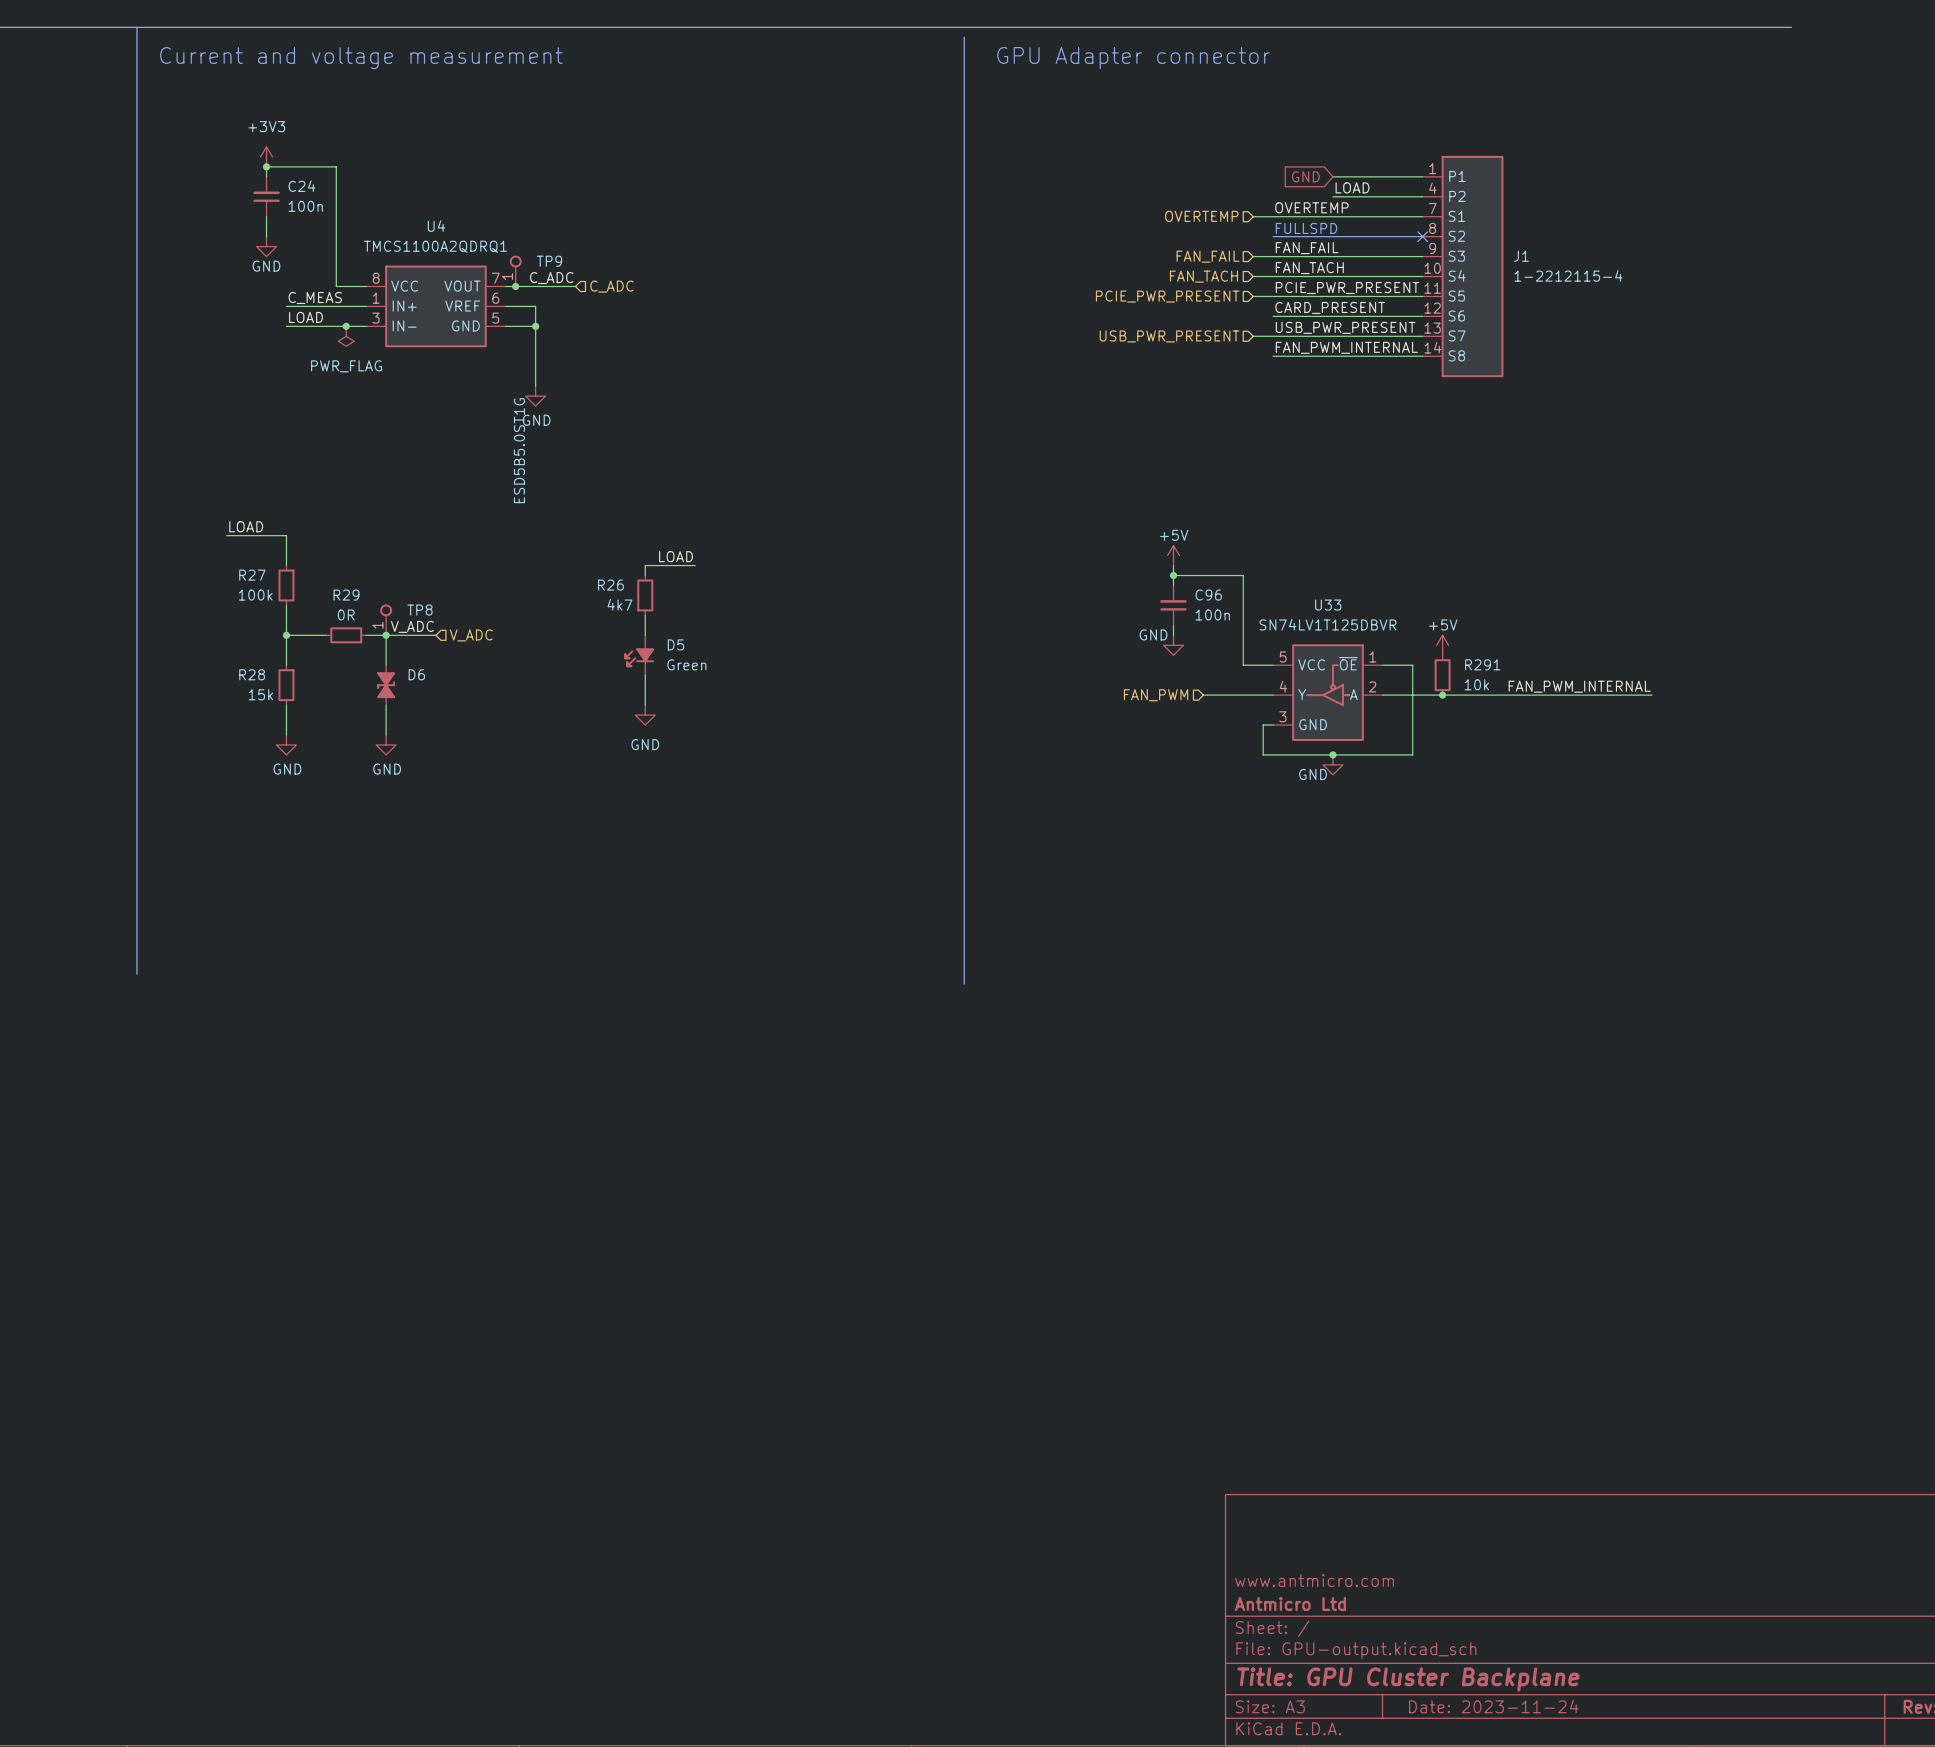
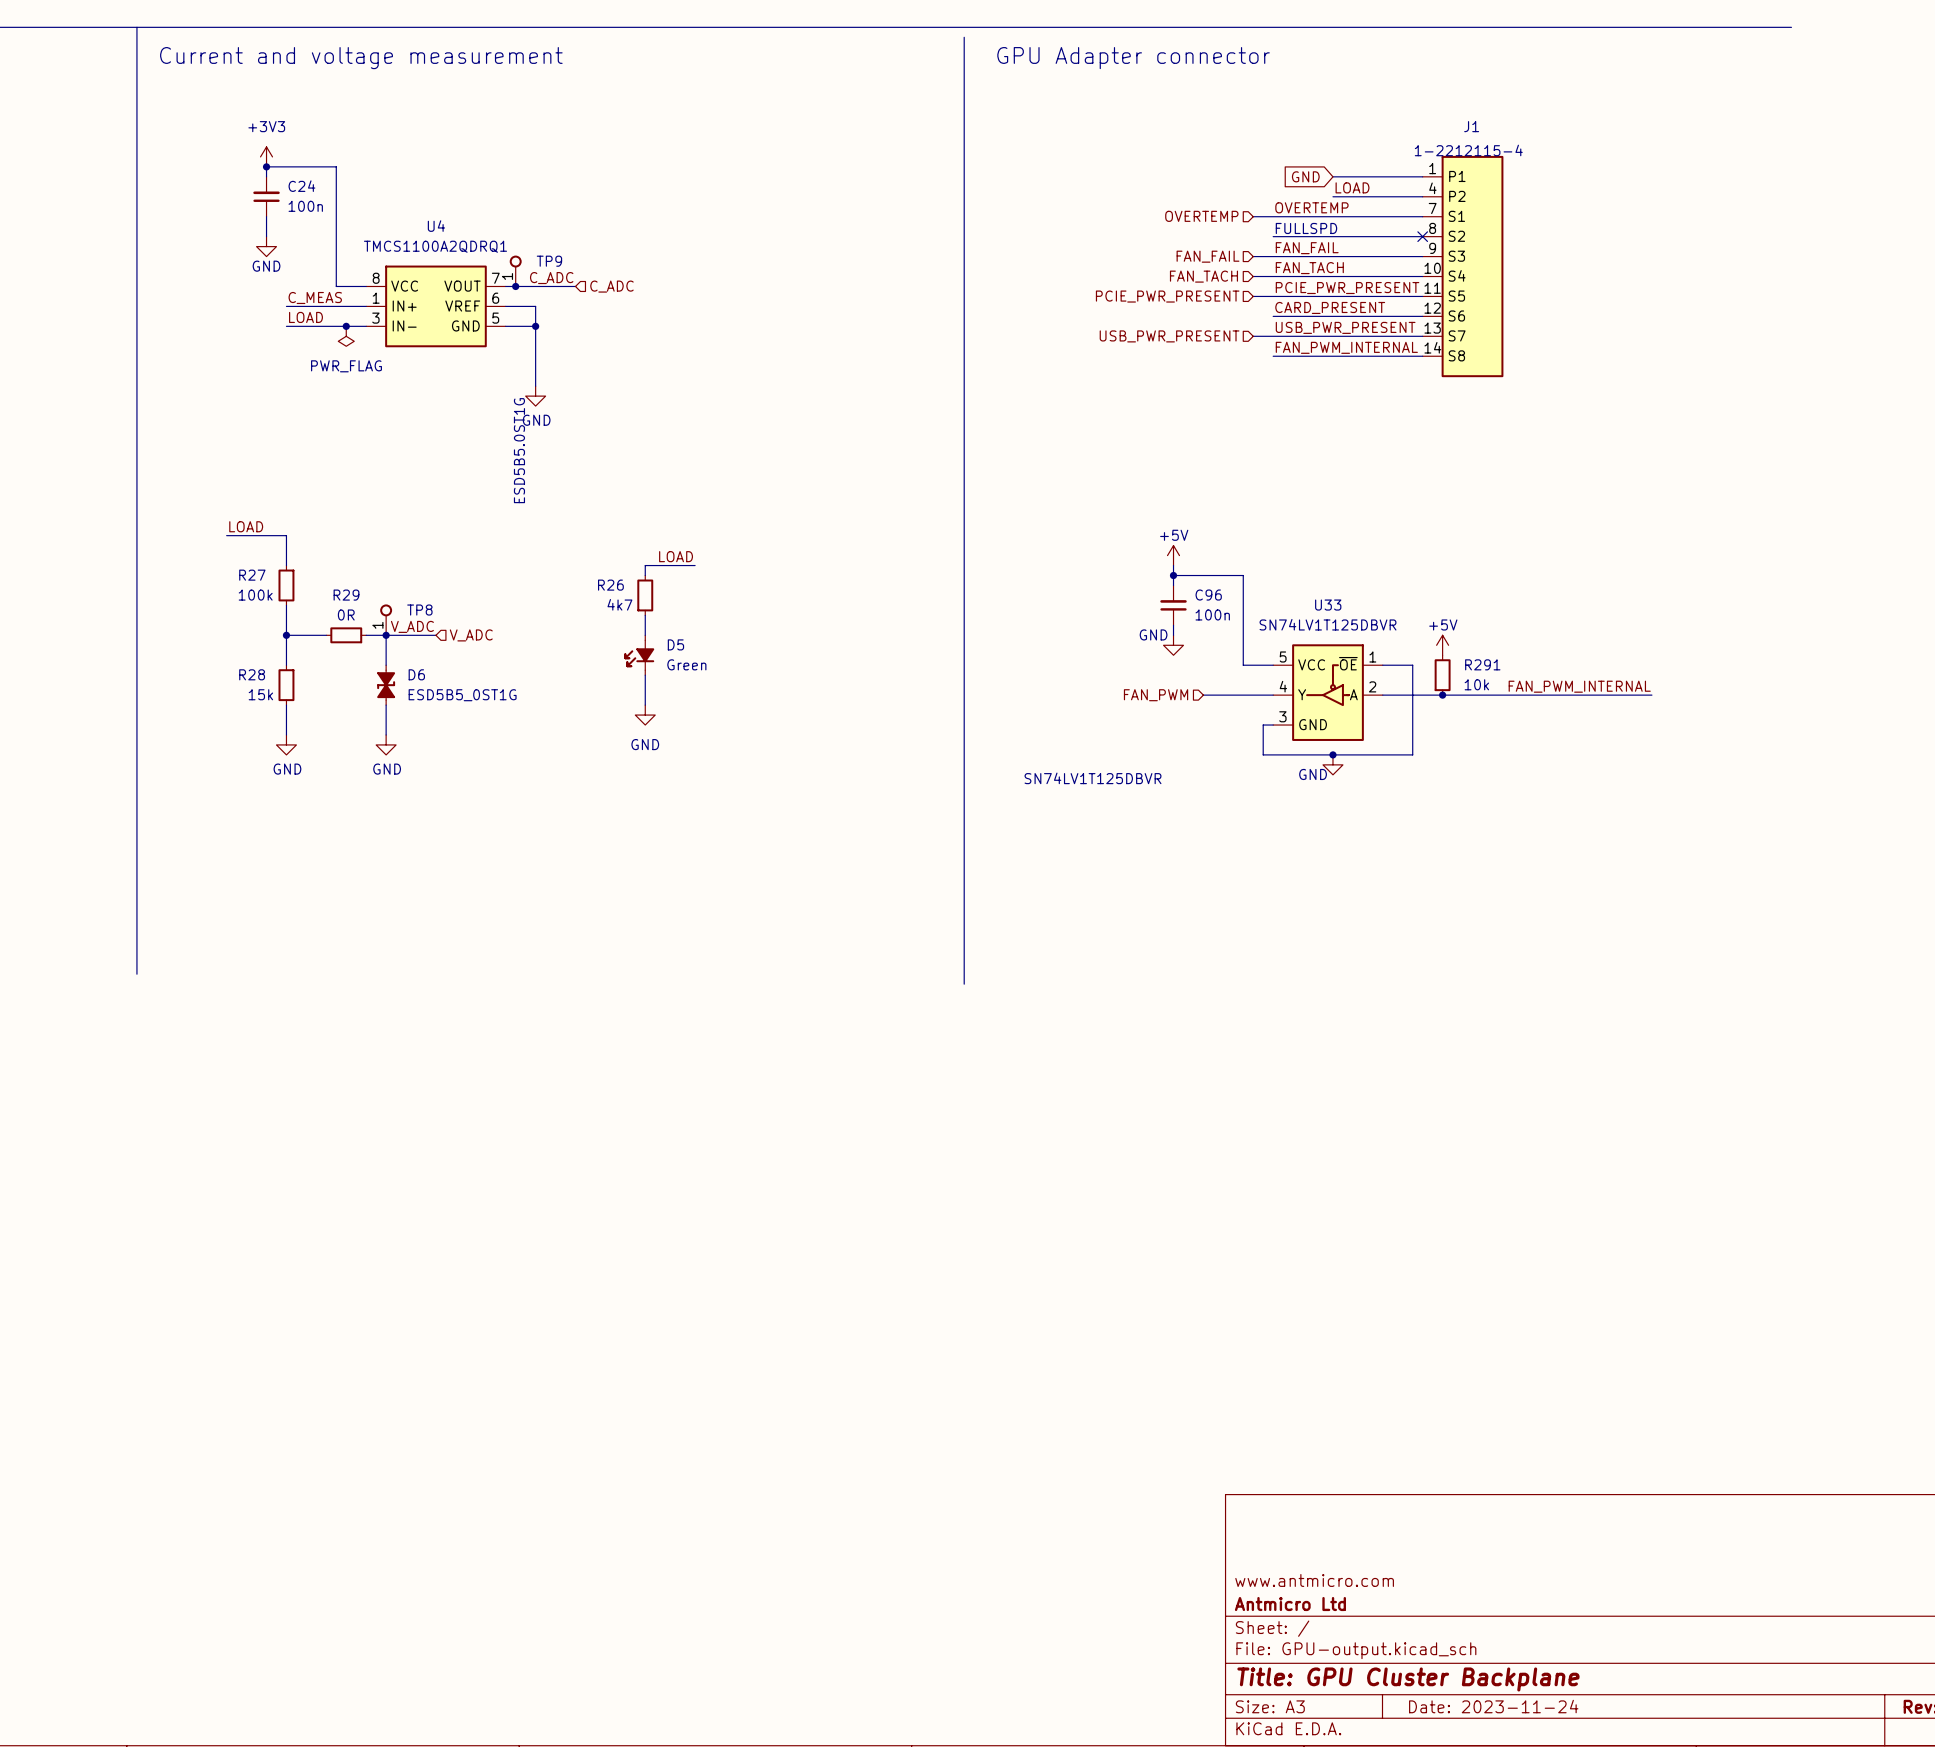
J1 name position: J1 (1521, 256) -> J1 (1471, 126)
J1 text position: 1-2212115-4 (1568, 275) -> 1-2212115-4 (1468, 150)
U33 text position: SN74LV1T125DBVR (1327, 624) -> SN74LV1T125DBVR (1093, 778)
D6 value: none -> ESD5B5_0ST1G (462, 695)

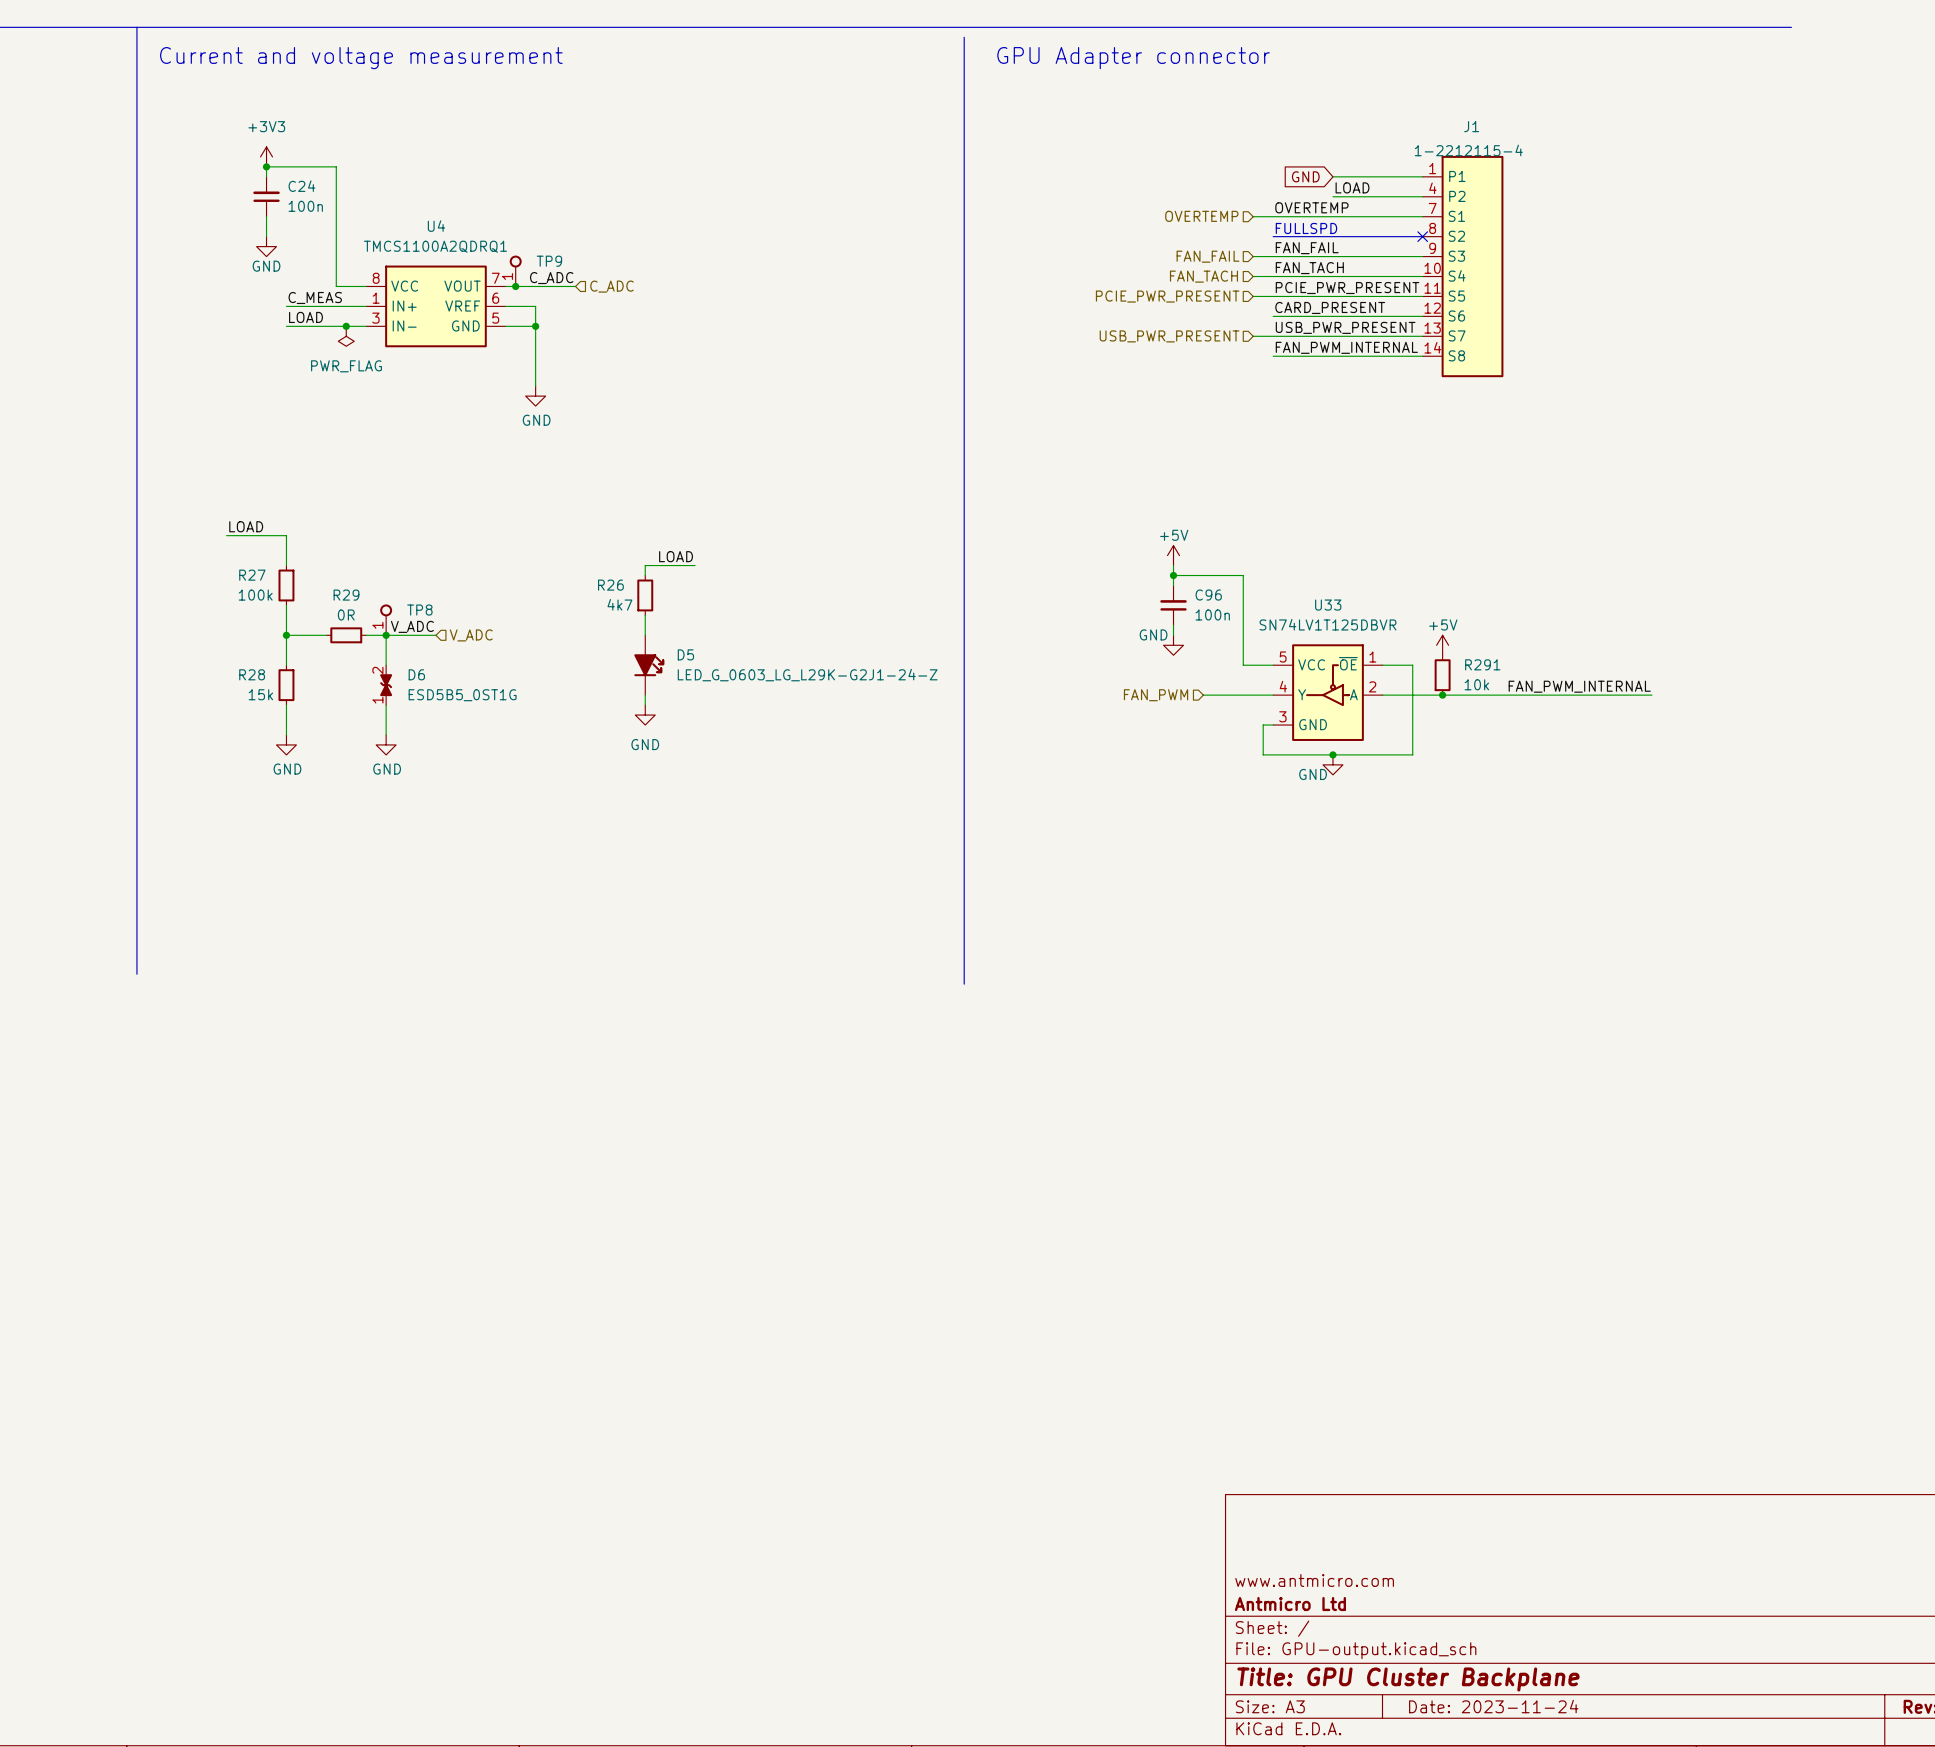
D6 text: ESD5B5.0ST1G (519, 450) -> none
D5 symbol: [624, 635, 655, 676] -> [634, 635, 665, 696]
D5 text: Green (686, 664) -> none
D6 symbol: [377, 665, 396, 706] -> [380, 665, 393, 706]
D5 value: none -> LED_G_0603_LG_L29K-G2J1-24-Z (807, 675)
U33 text: SN74LV1T125DBVR (1093, 778) -> none

